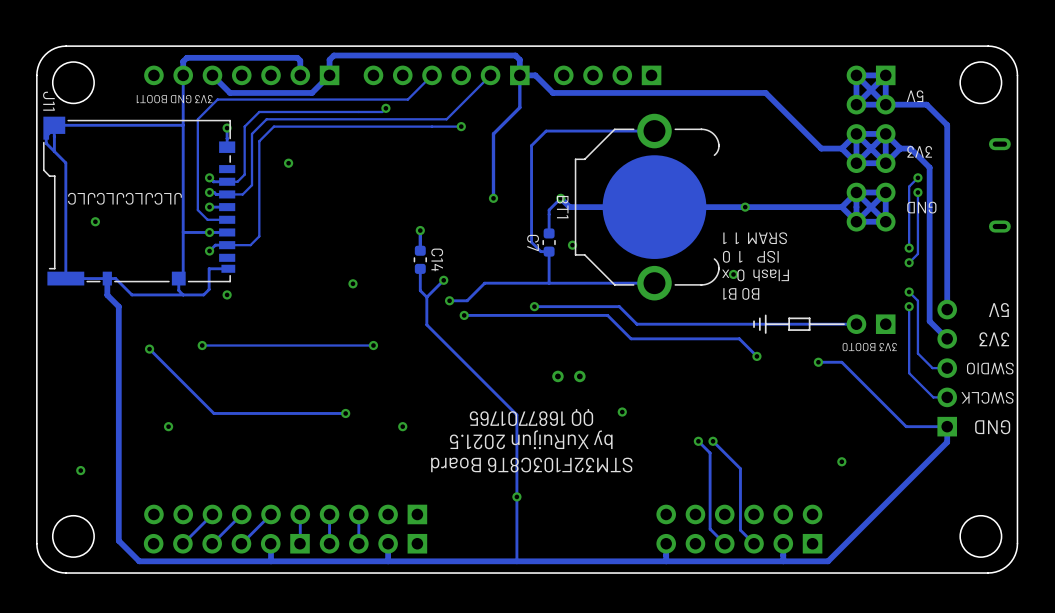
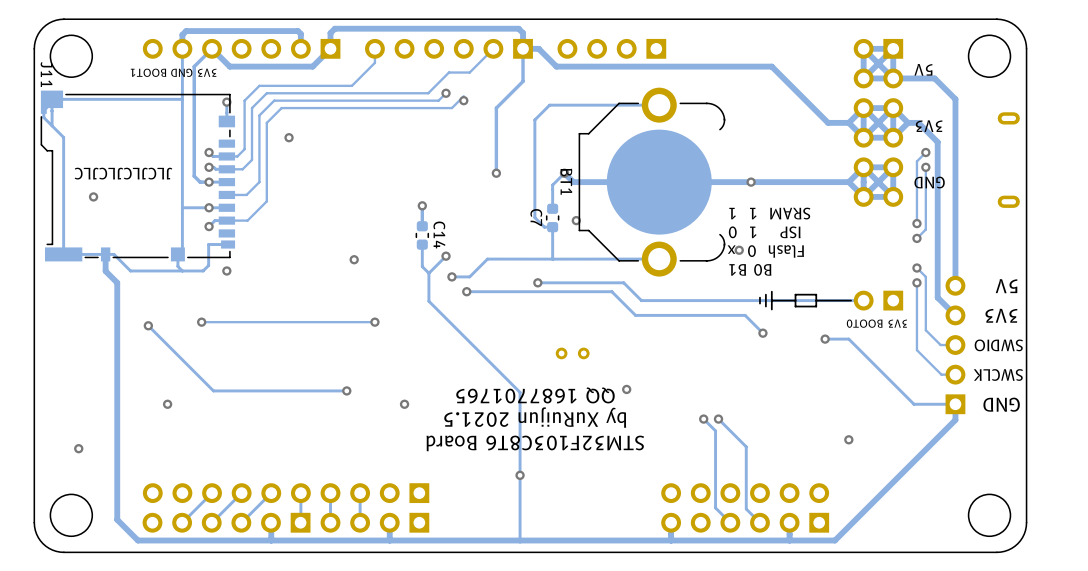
track: none -> (212, 48) (194, 66) (194, 176) (200, 182) (209, 182)
track: (432, 75) (407, 99) (217, 99) (197, 119) (197, 210) (207, 219) (227, 219) -> none
track: (467, 98) (446, 119) (426, 119) -> (469, 72) (448, 72) (428, 93)
track: (385, 108) (382, 111) (350, 111) -> (374, 48) (374, 62) (351, 85)
via position: (385, 108) -> (446, 93)
track: none -> (463, 96) (451, 108) (281, 108) (266, 122) (266, 201) (247, 220)
track: (461, 126) (436, 126) -> (446, 93) (438, 100)
track: (259, 207) (259, 236) (250, 245) (247, 245) -> (259, 182) (246, 194) (226, 194)

